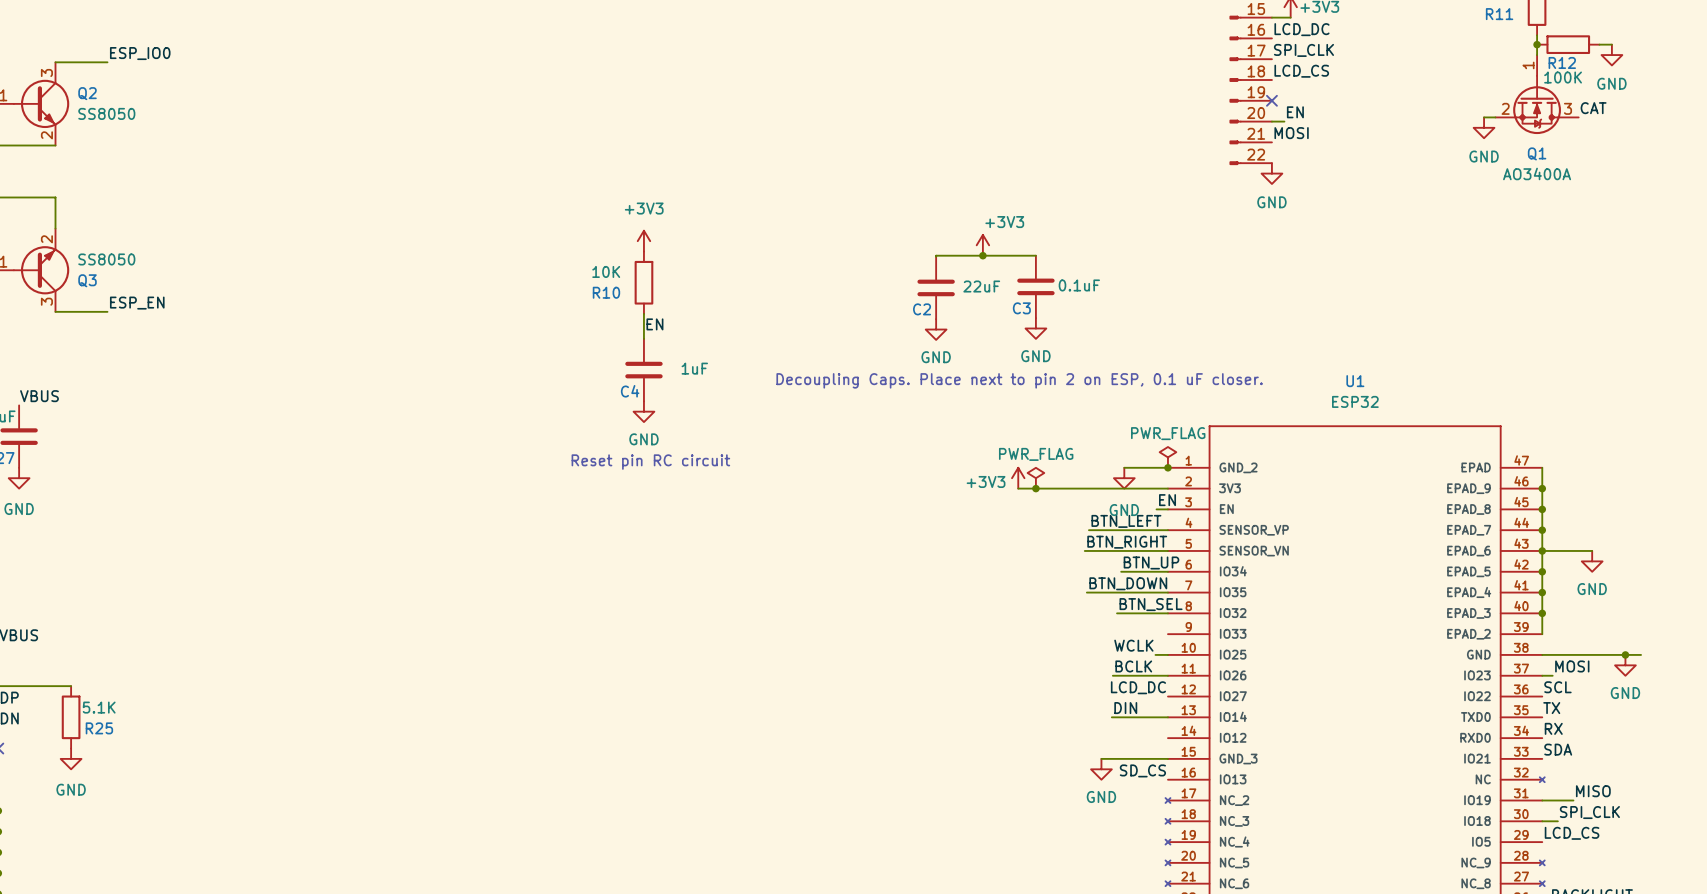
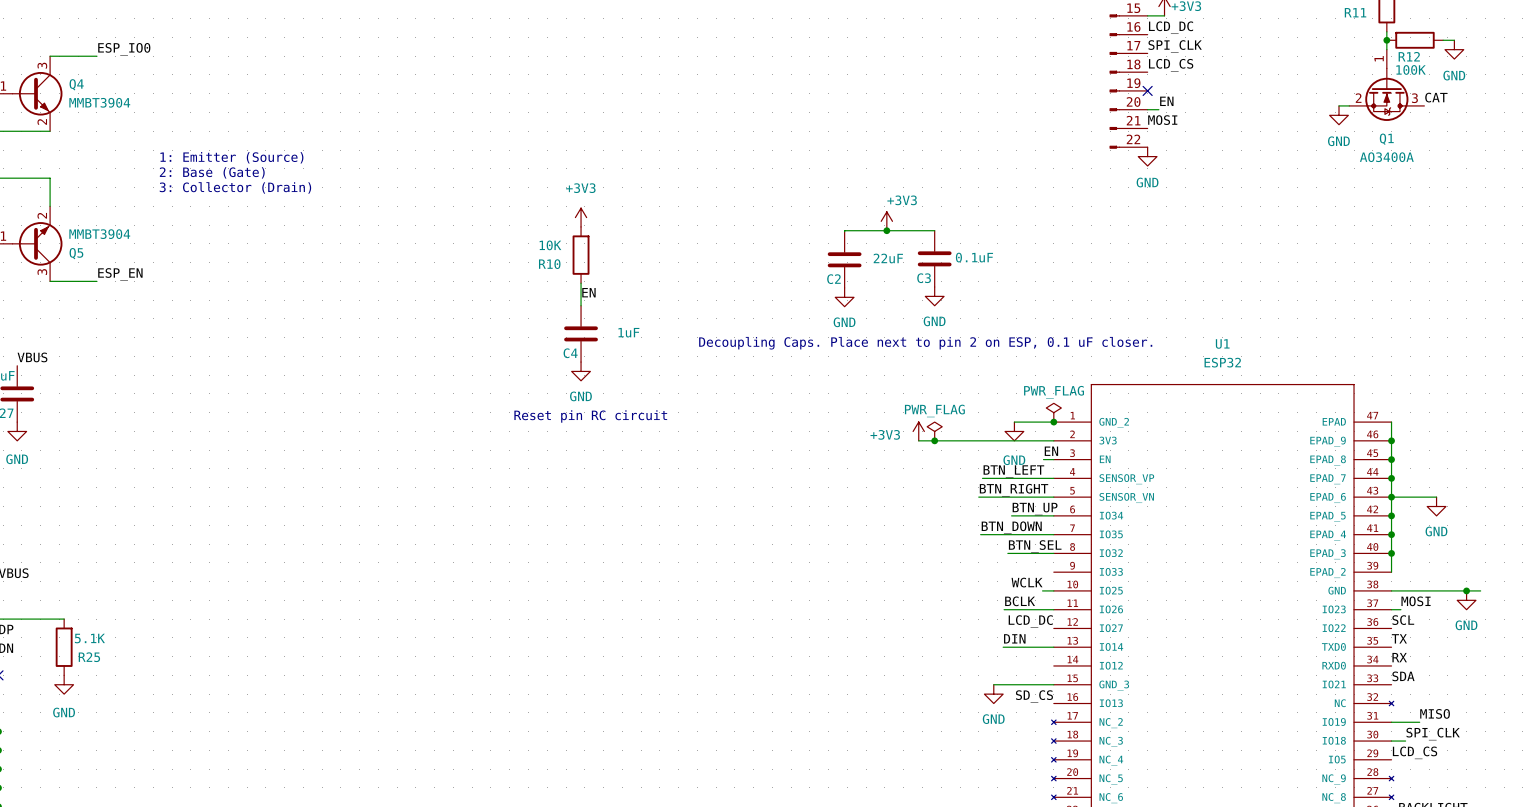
Q2 name: Q2 (87, 93) -> Q4 (76, 84)
Q2 value: SS8050 (106, 113) -> MMBT3904 (99, 102)
text: none -> 1: Emitter (Source) (231, 157)
text: none -> 2: Base (Gate) (212, 172)
text: none -> 3: Collector (Drain) (235, 187)
Q3 value: SS8050 (106, 259) -> MMBT3904 (99, 234)
Q3 name: Q3 (87, 280) -> Q5 (76, 253)

